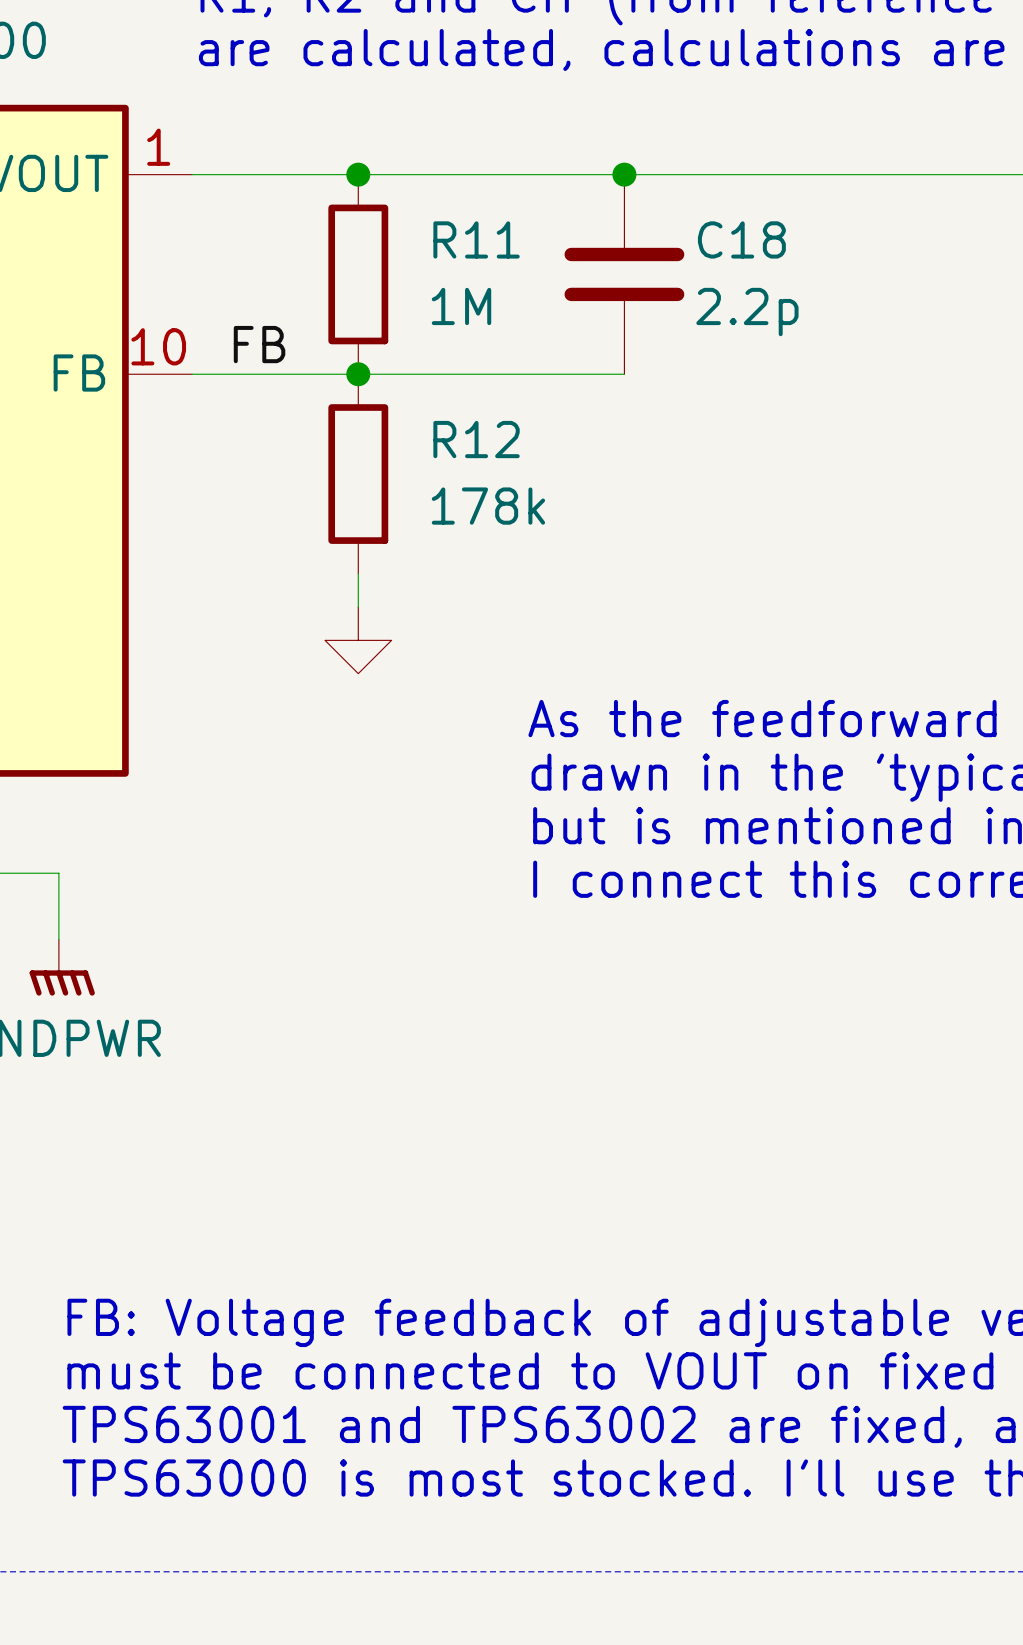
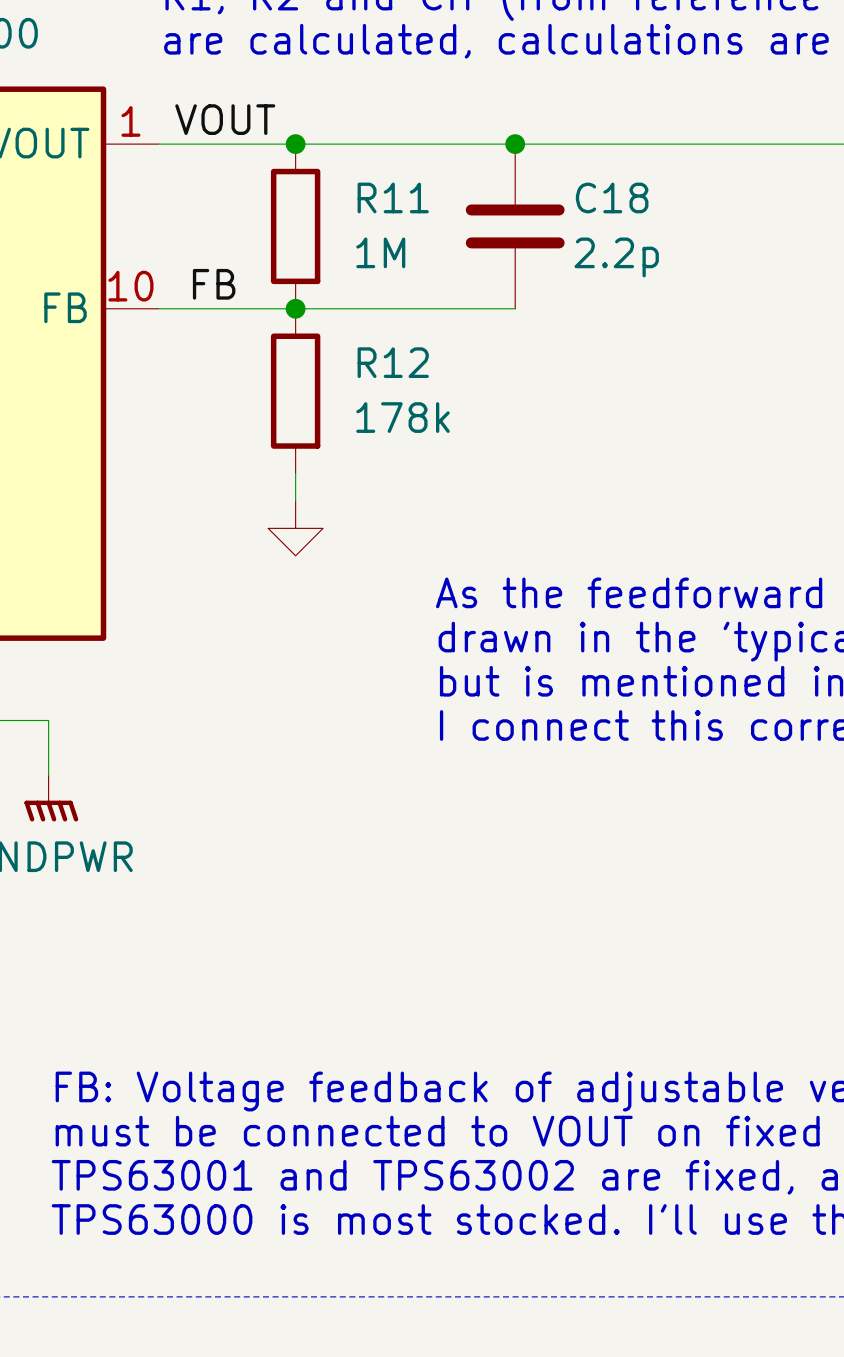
label: none -> VOUT (225, 119)

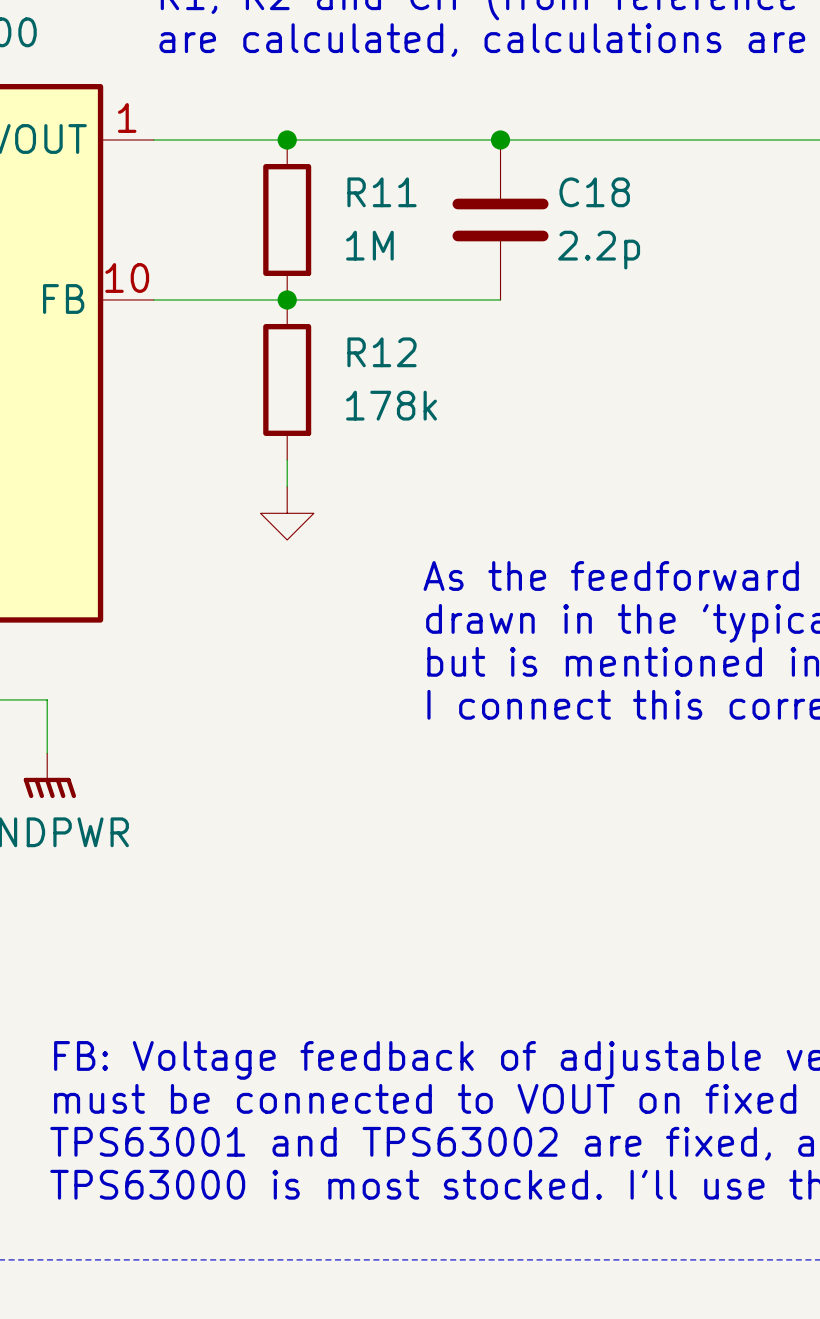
label: VOUT (225, 119) -> none
label: FB (214, 284) -> none

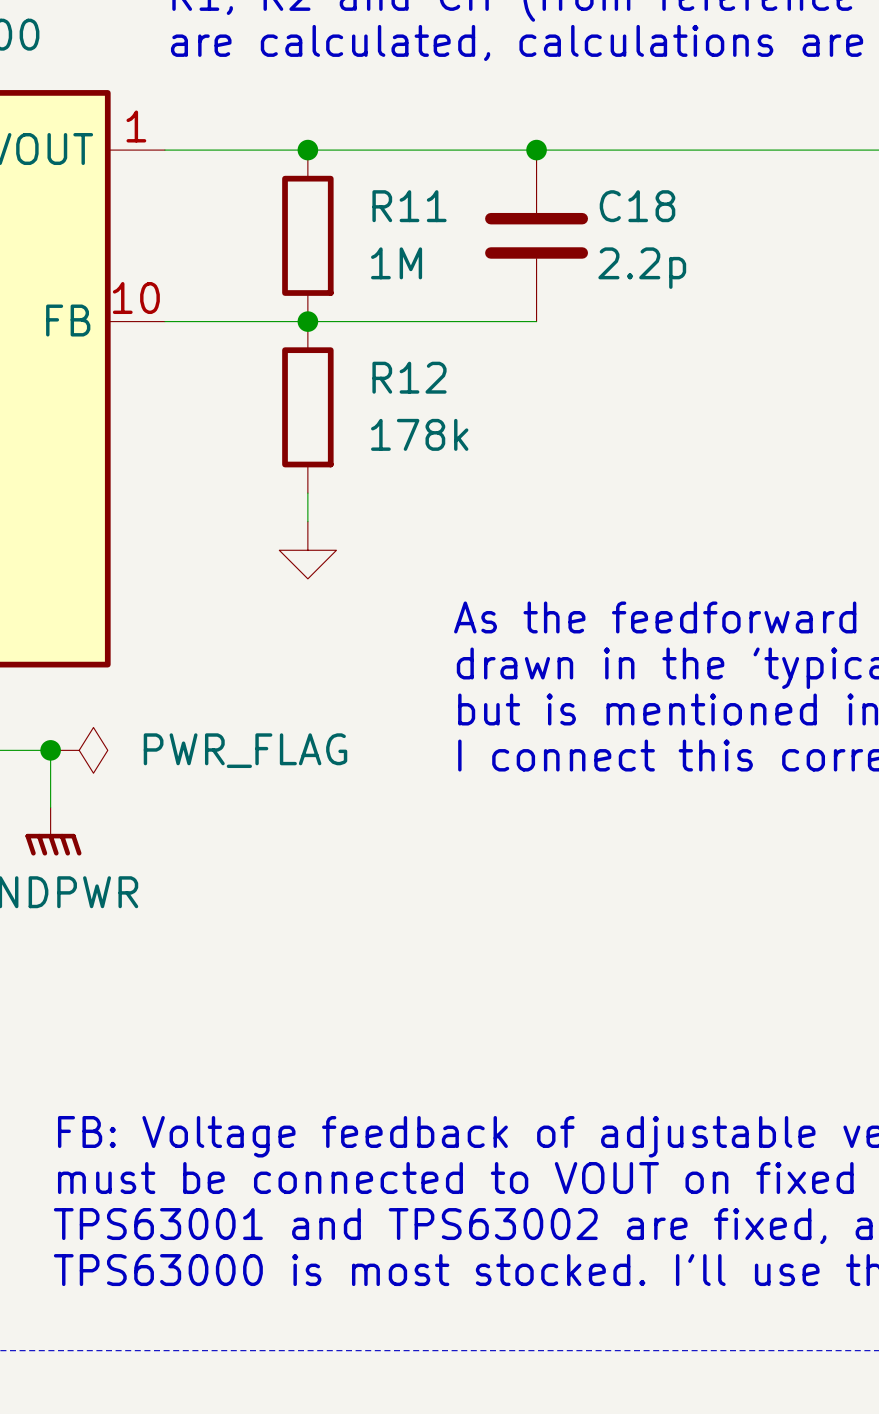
junction: none -> (50, 750)
power symbol: none -> PWR_FLAG (79, 750)

